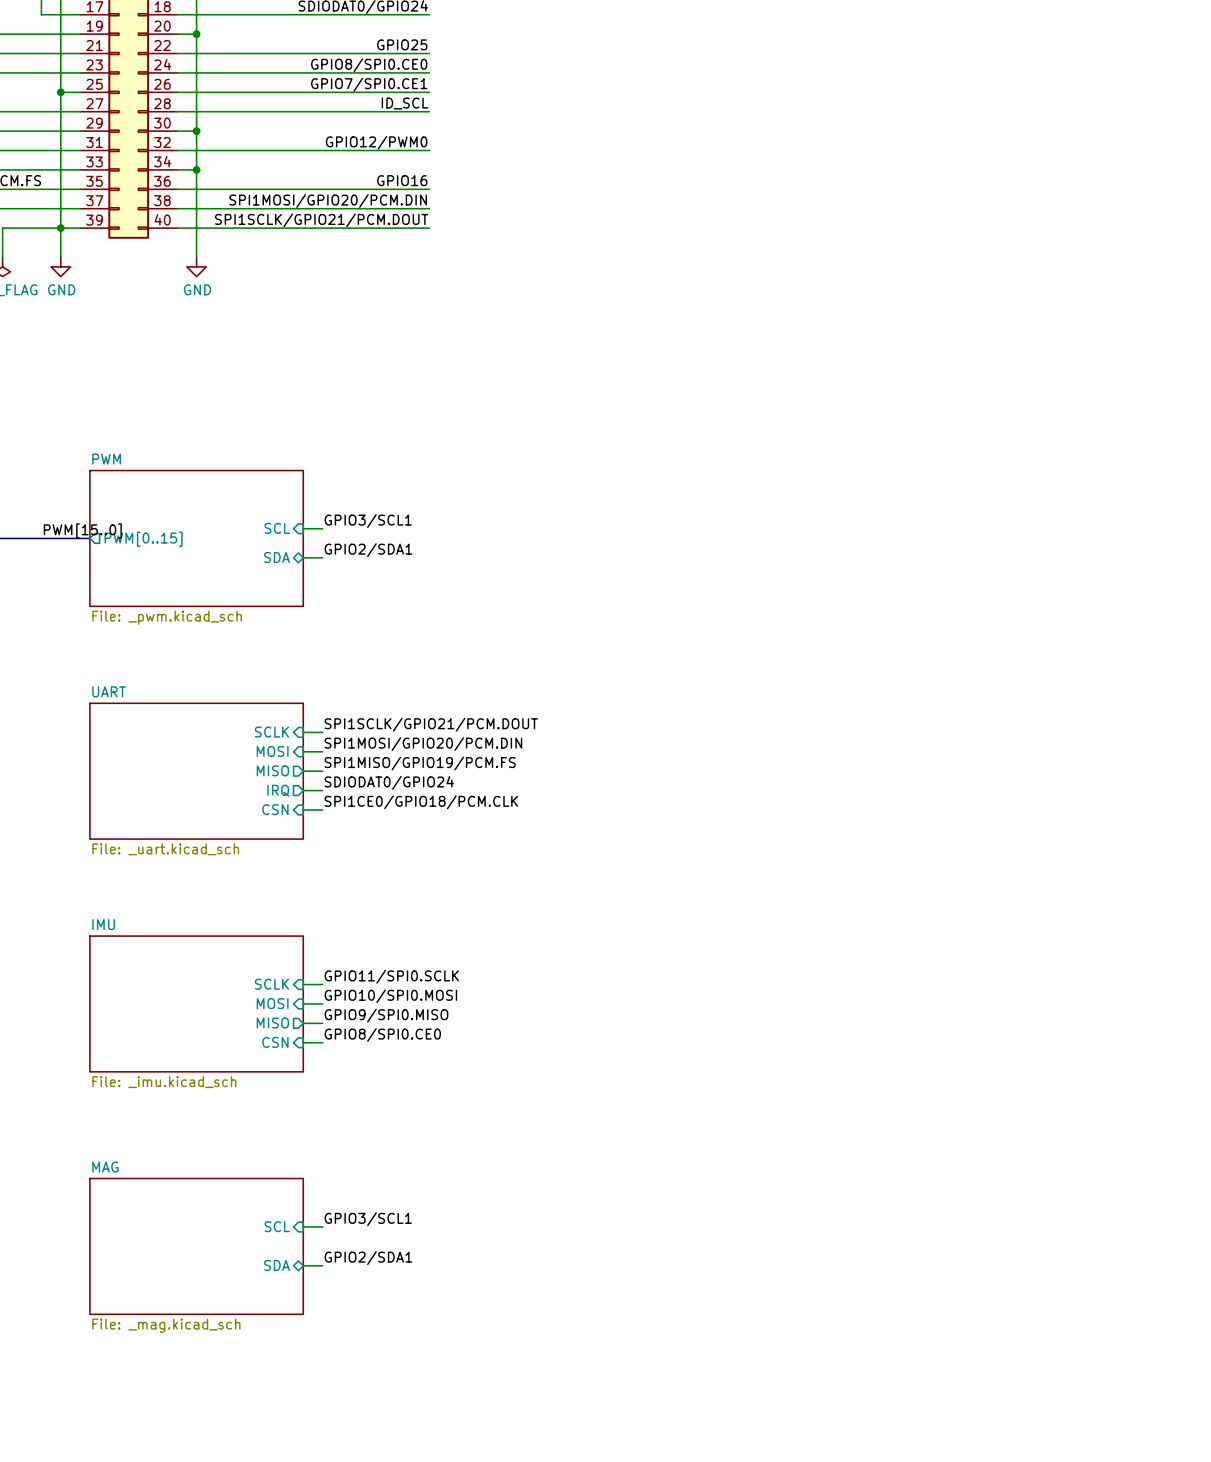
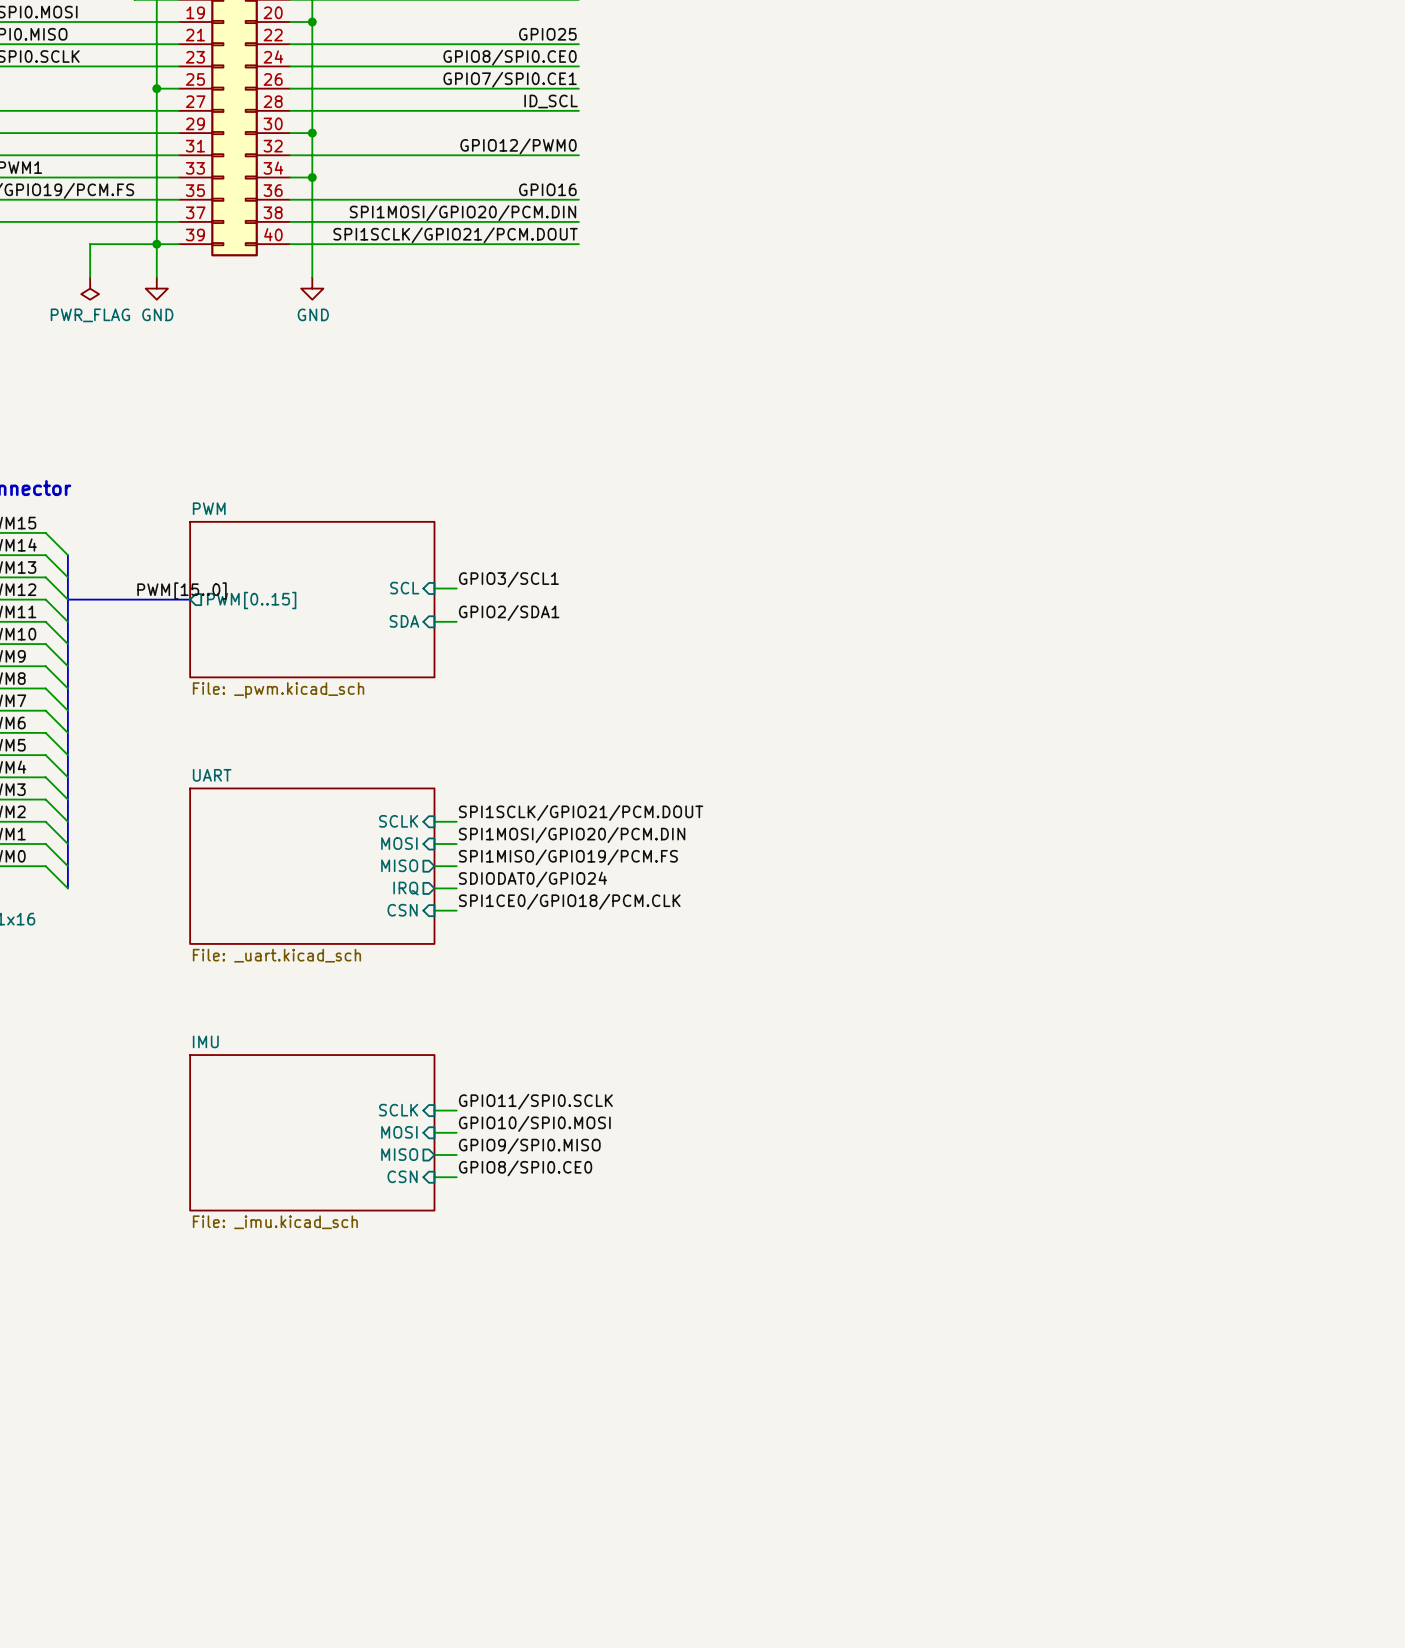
sheet pin shape: bidirectional (277, 557) -> input (404, 621)
label: GPIO3/SCL1 (368, 1219) -> none
sheet pin: SCL (277, 1226) -> none
wire: (303, 1227) (322, 1227) -> none
sheet MAG: File: _mag.kicad_sch (196, 1246) -> none
label: GPIO2/SDA1 (368, 1258) -> none
sheet pin: SDA (277, 1265) -> none
wire: (303, 1265) (322, 1265) -> none

